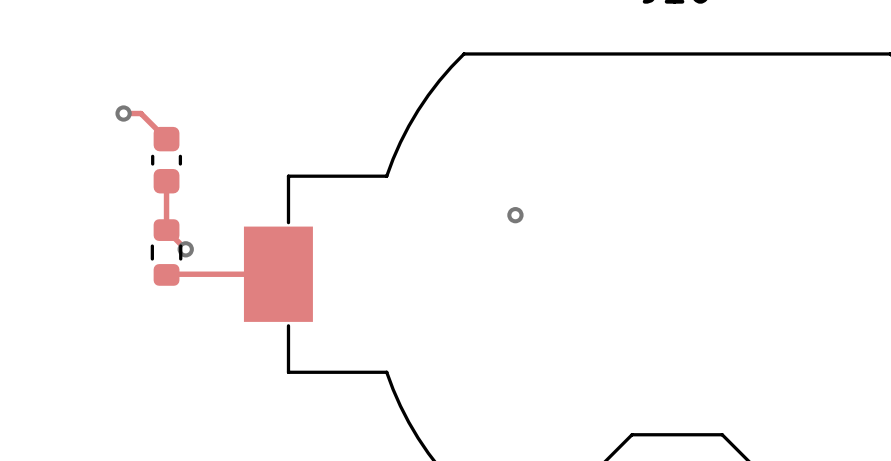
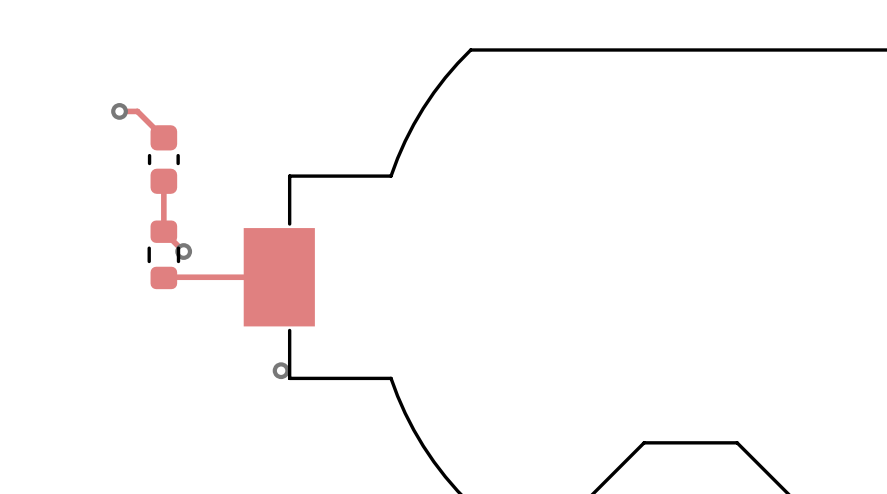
via: (515, 215) -> none
via: none -> (281, 370)

